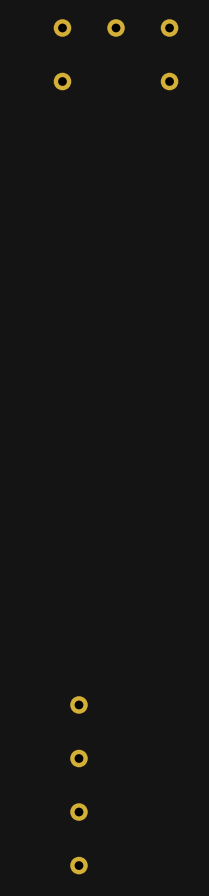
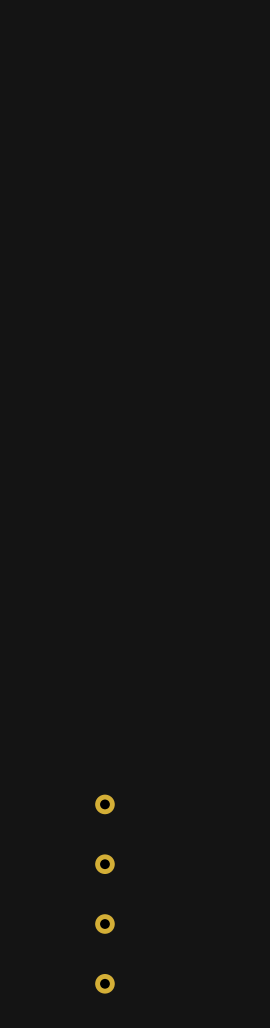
part: (62, 27) -> none
part: (116, 27) -> none
part: (169, 27) -> none
part: (62, 81) -> none
part: (169, 81) -> none

